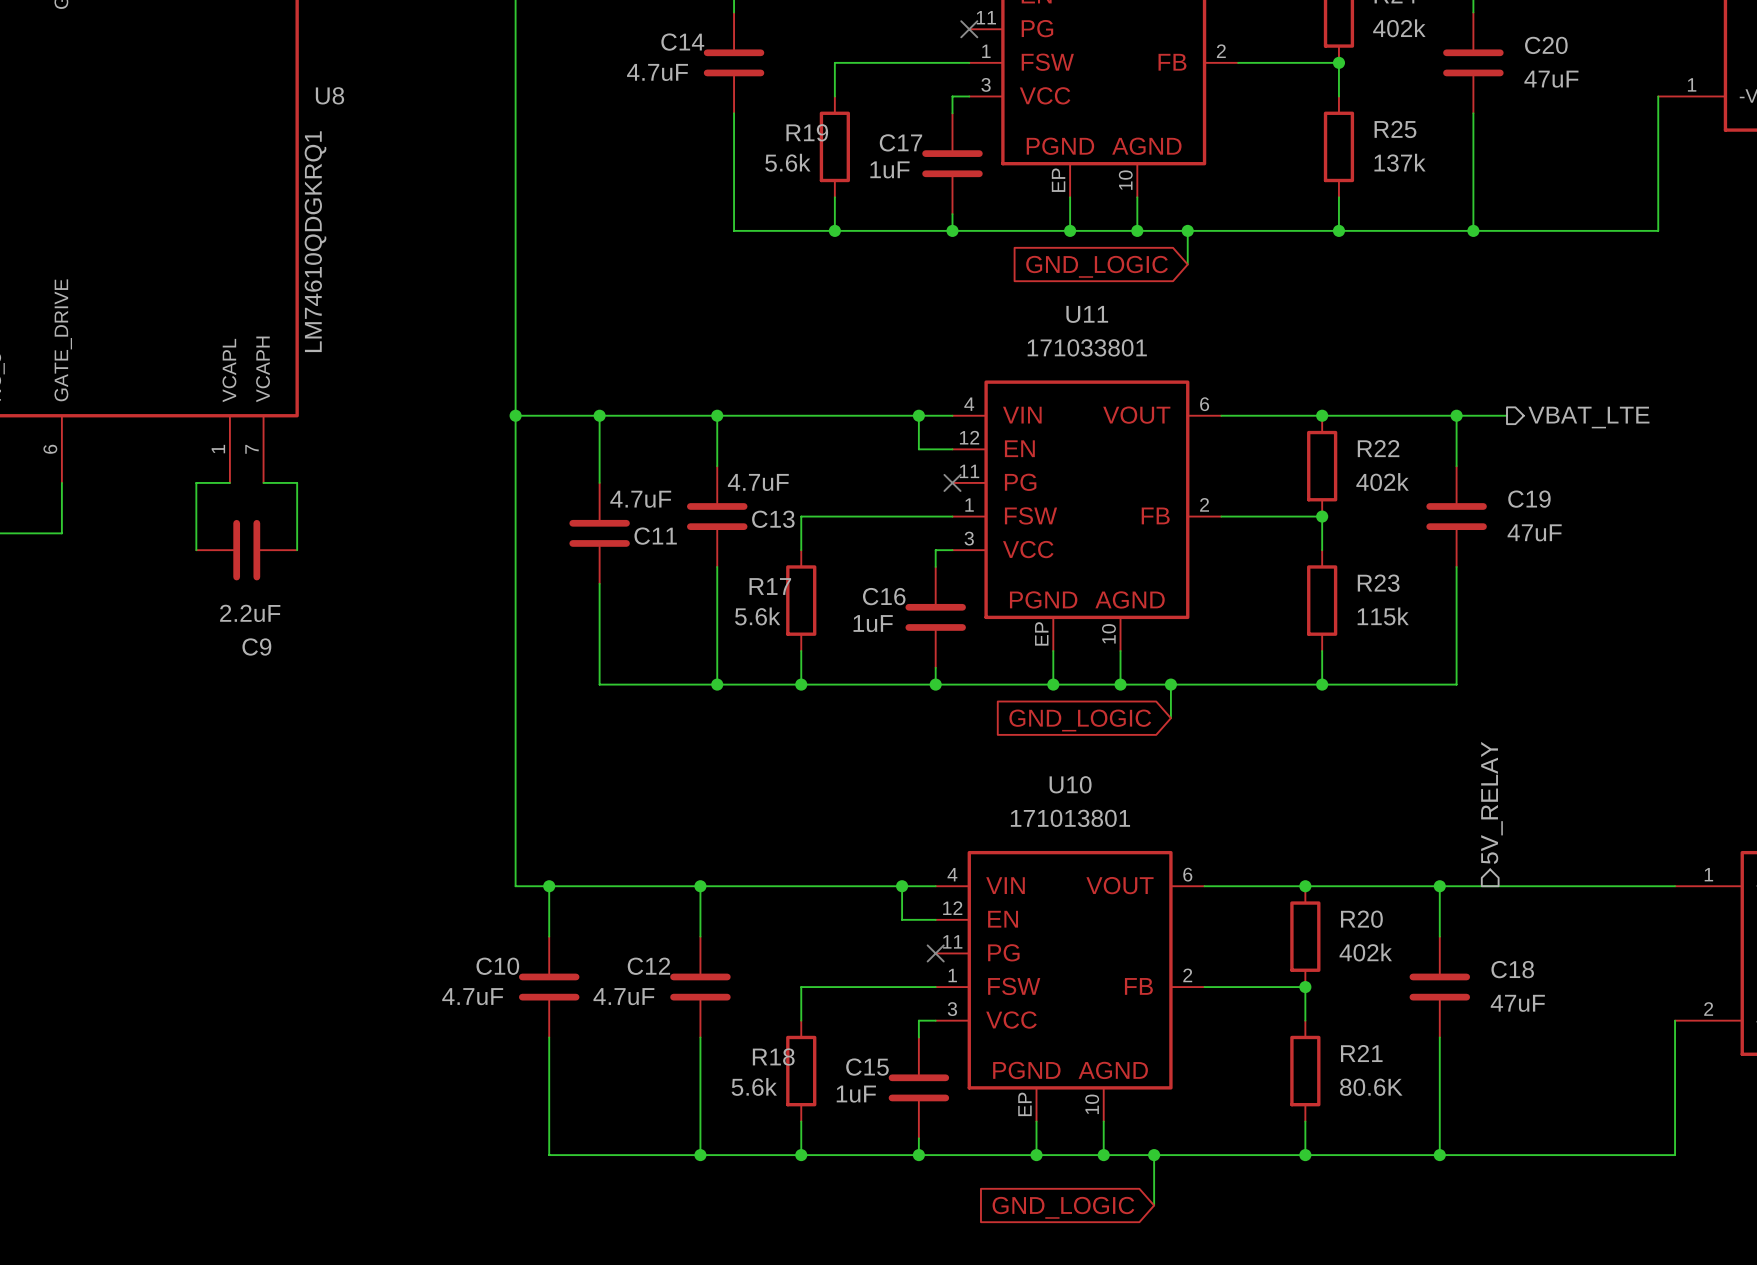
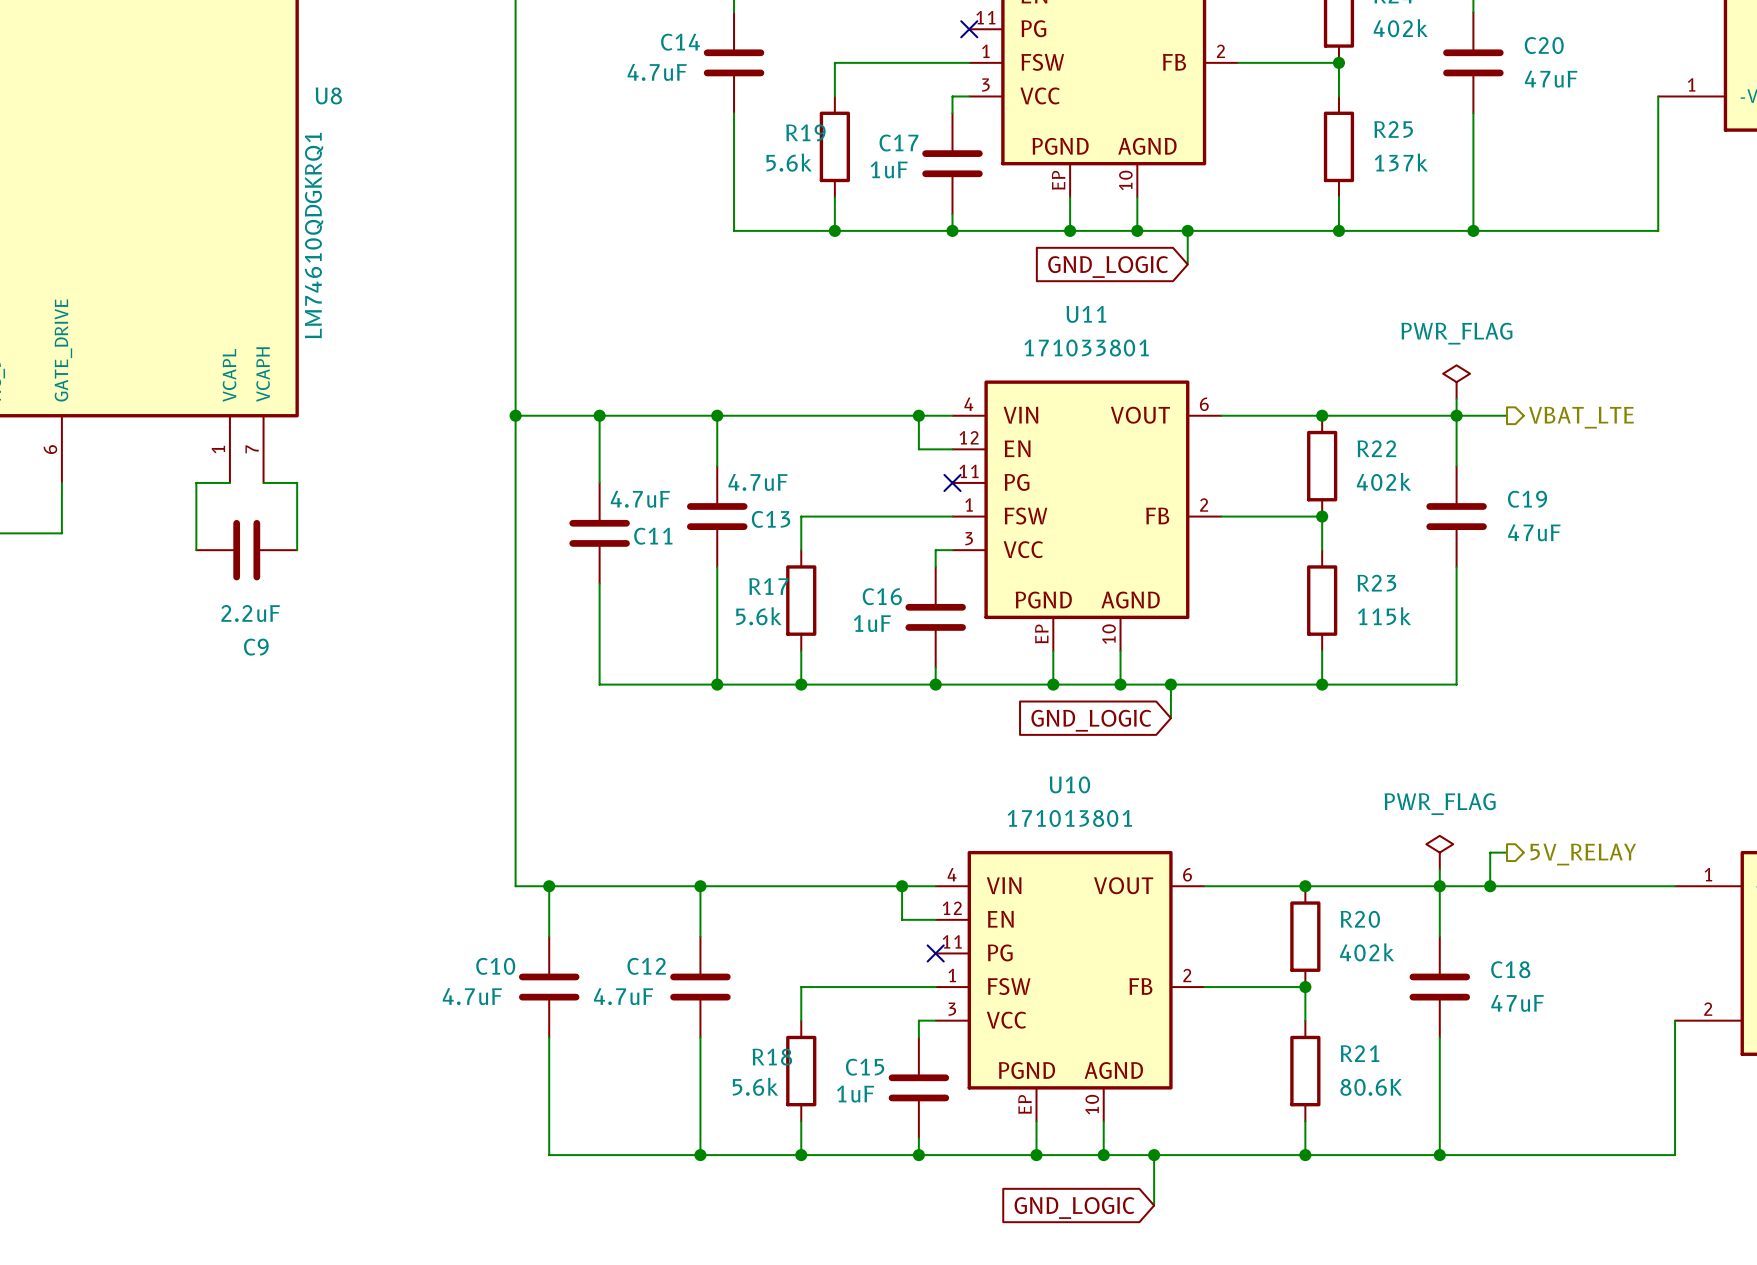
power symbol: none -> PWR_FLAG (1456, 382)
wire: none -> (1456, 398) (1456, 415)
hierarchical label rotation: 0° (1492, 802) -> 90° clockwise (1583, 854)
power symbol: none -> PWR_FLAG (1439, 852)
wire: none -> (1507, 852) (1490, 852) (1490, 886)
wire: none -> (1439, 869) (1439, 886)
junction: none -> (1490, 886)

